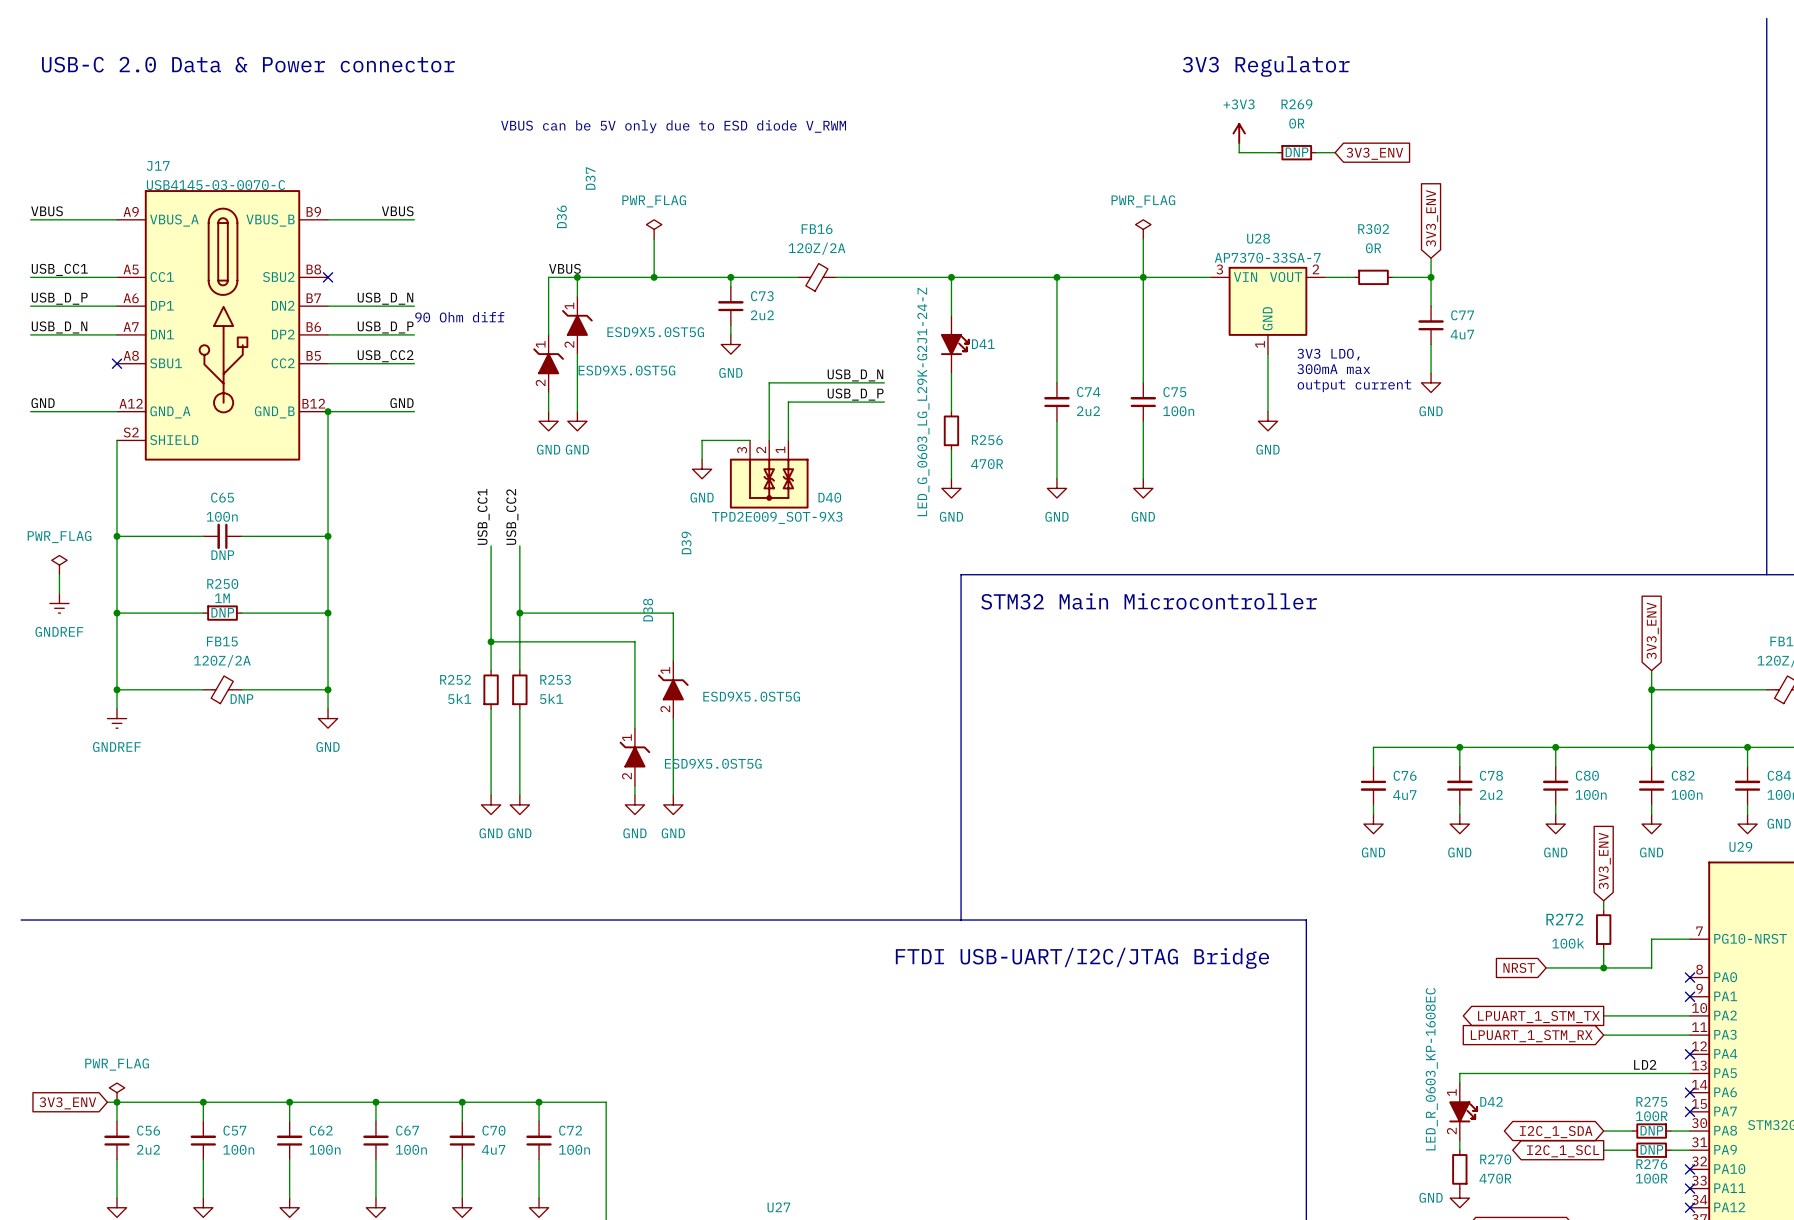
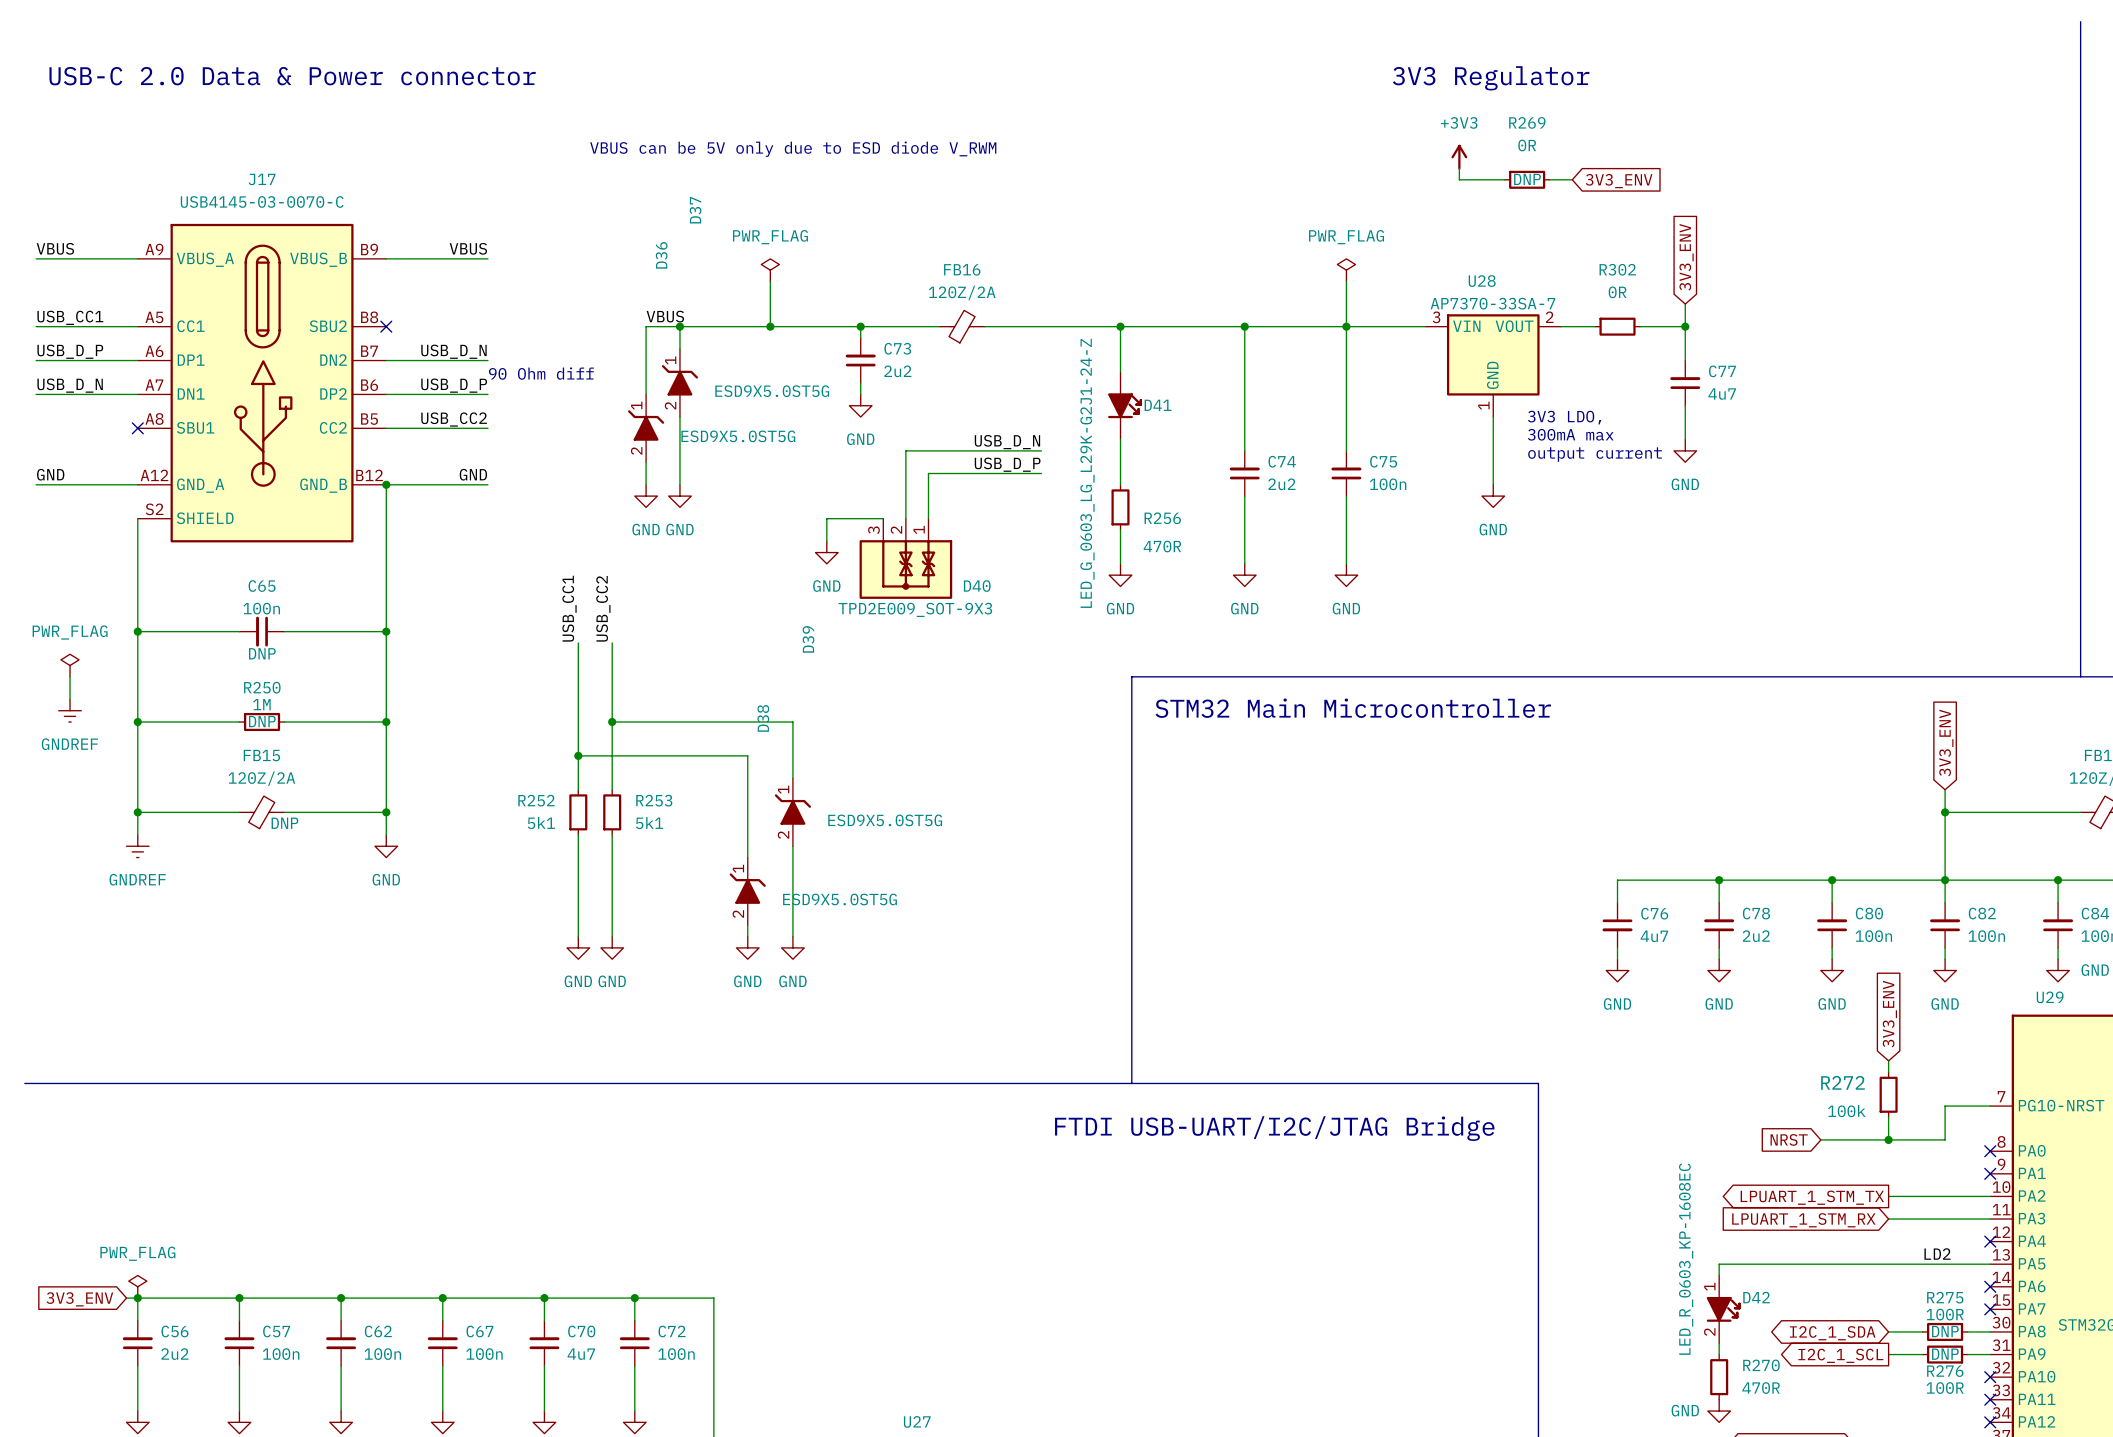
J17 name position: J17 (158, 165) -> J17 (262, 179)
J17 text position: USB4145-03-0070-C (215, 185) -> USB4145-03-0070-C (262, 201)

